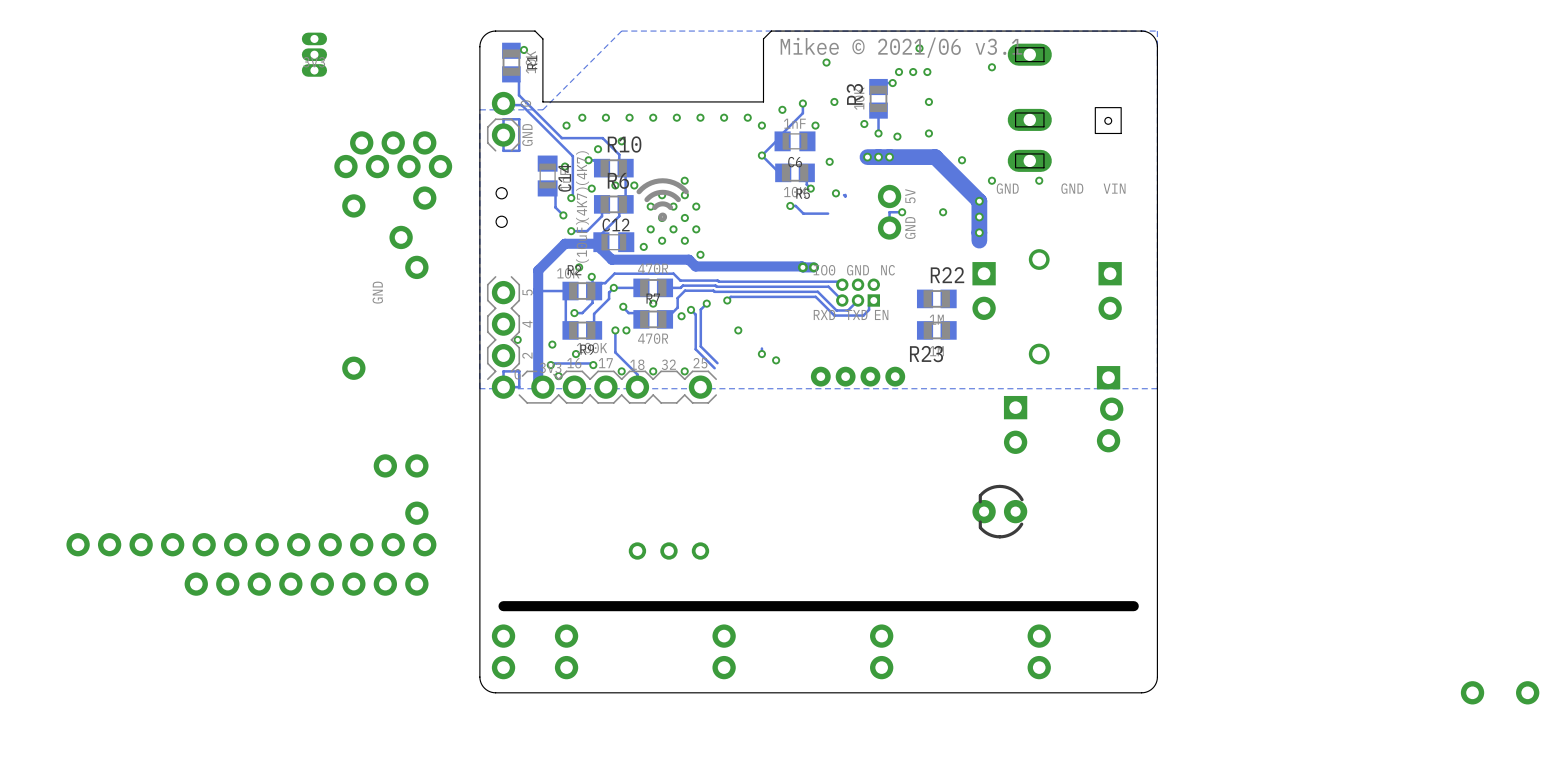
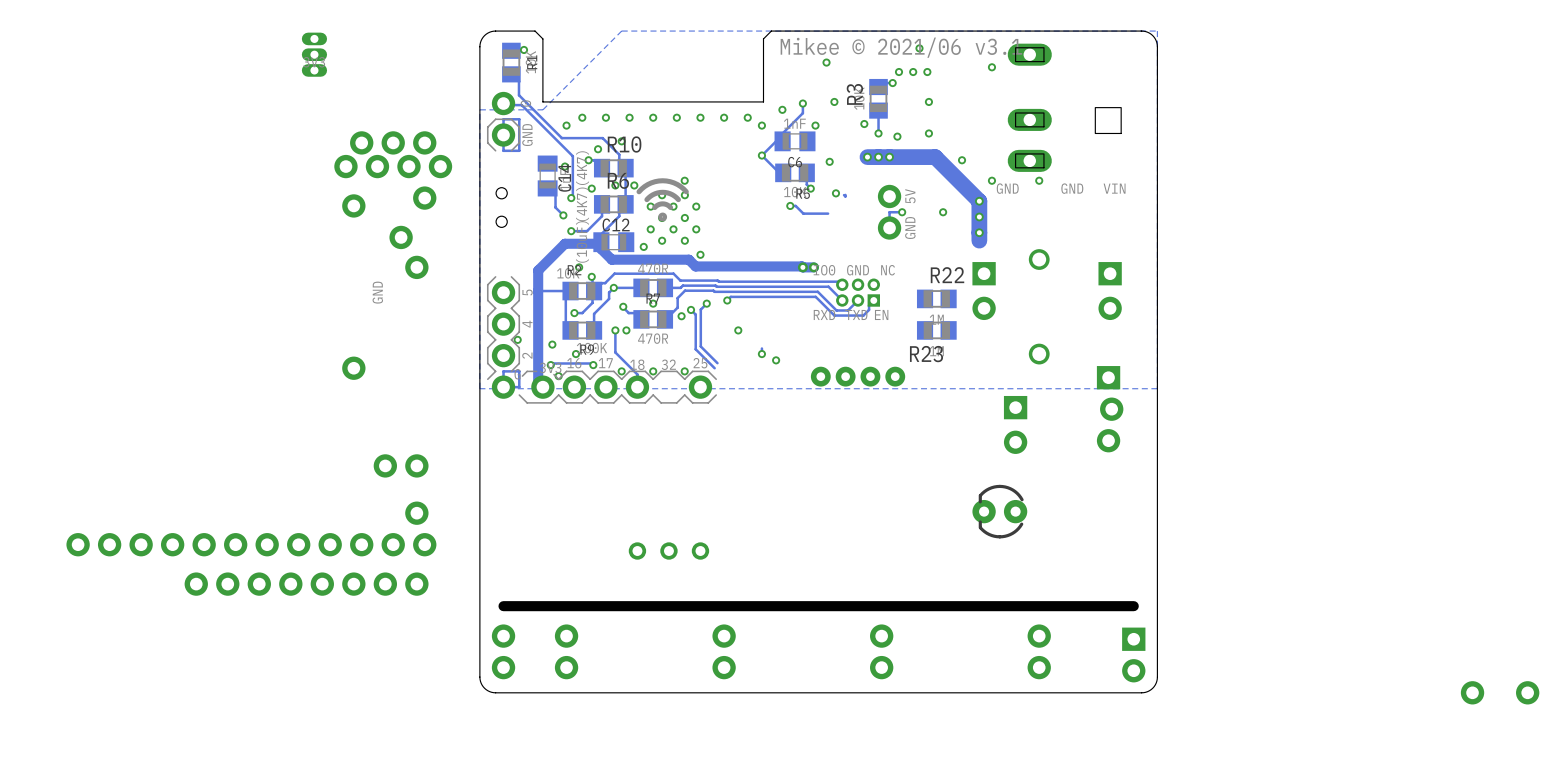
hole: (1108, 120) -> none
part: none -> (1133, 655)

